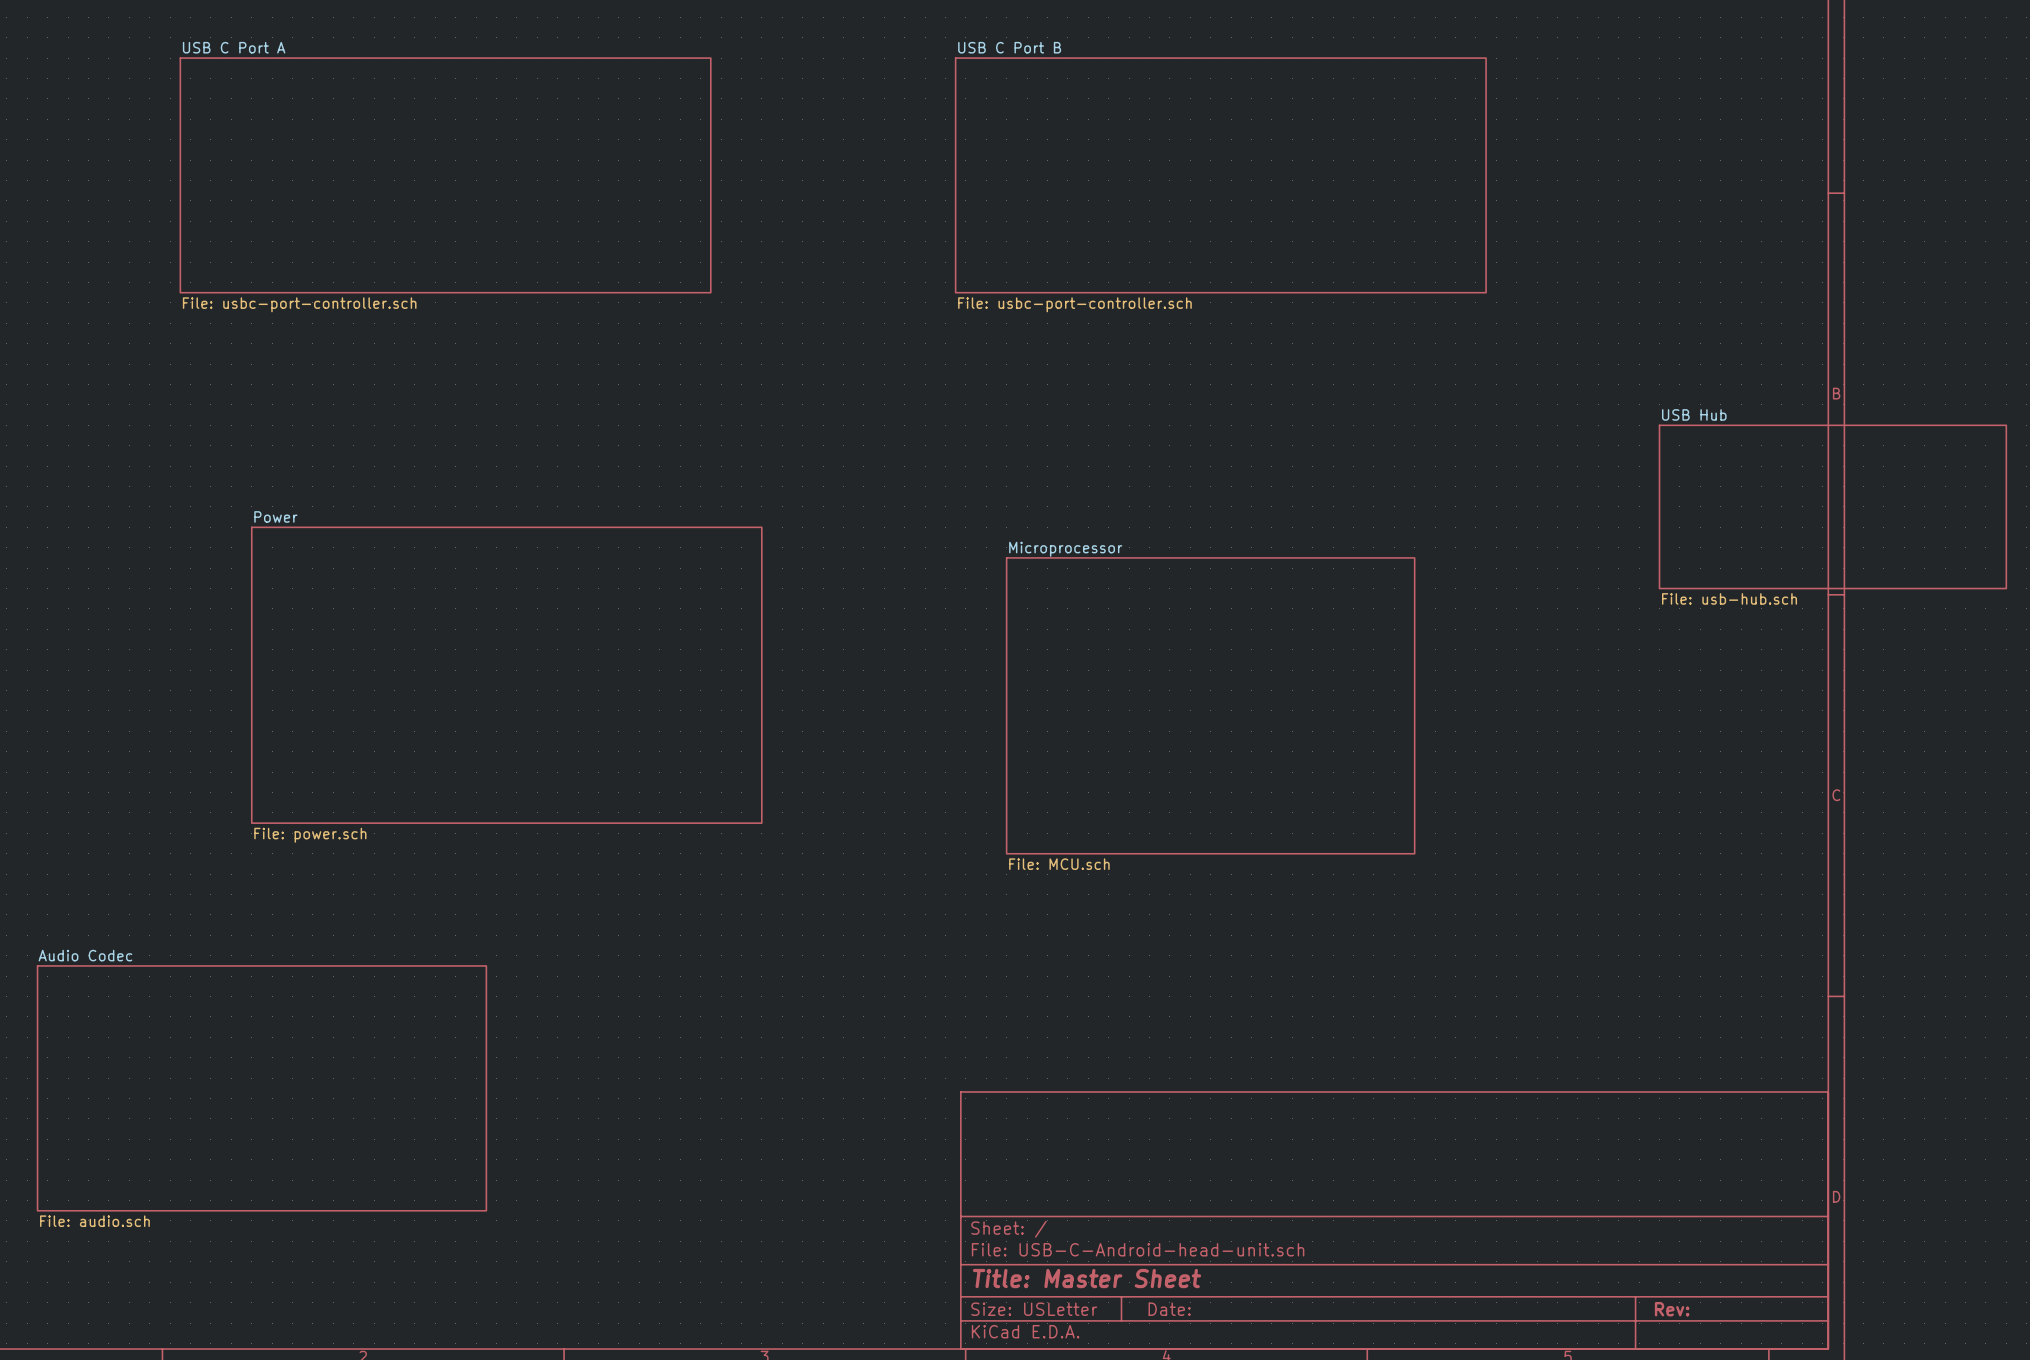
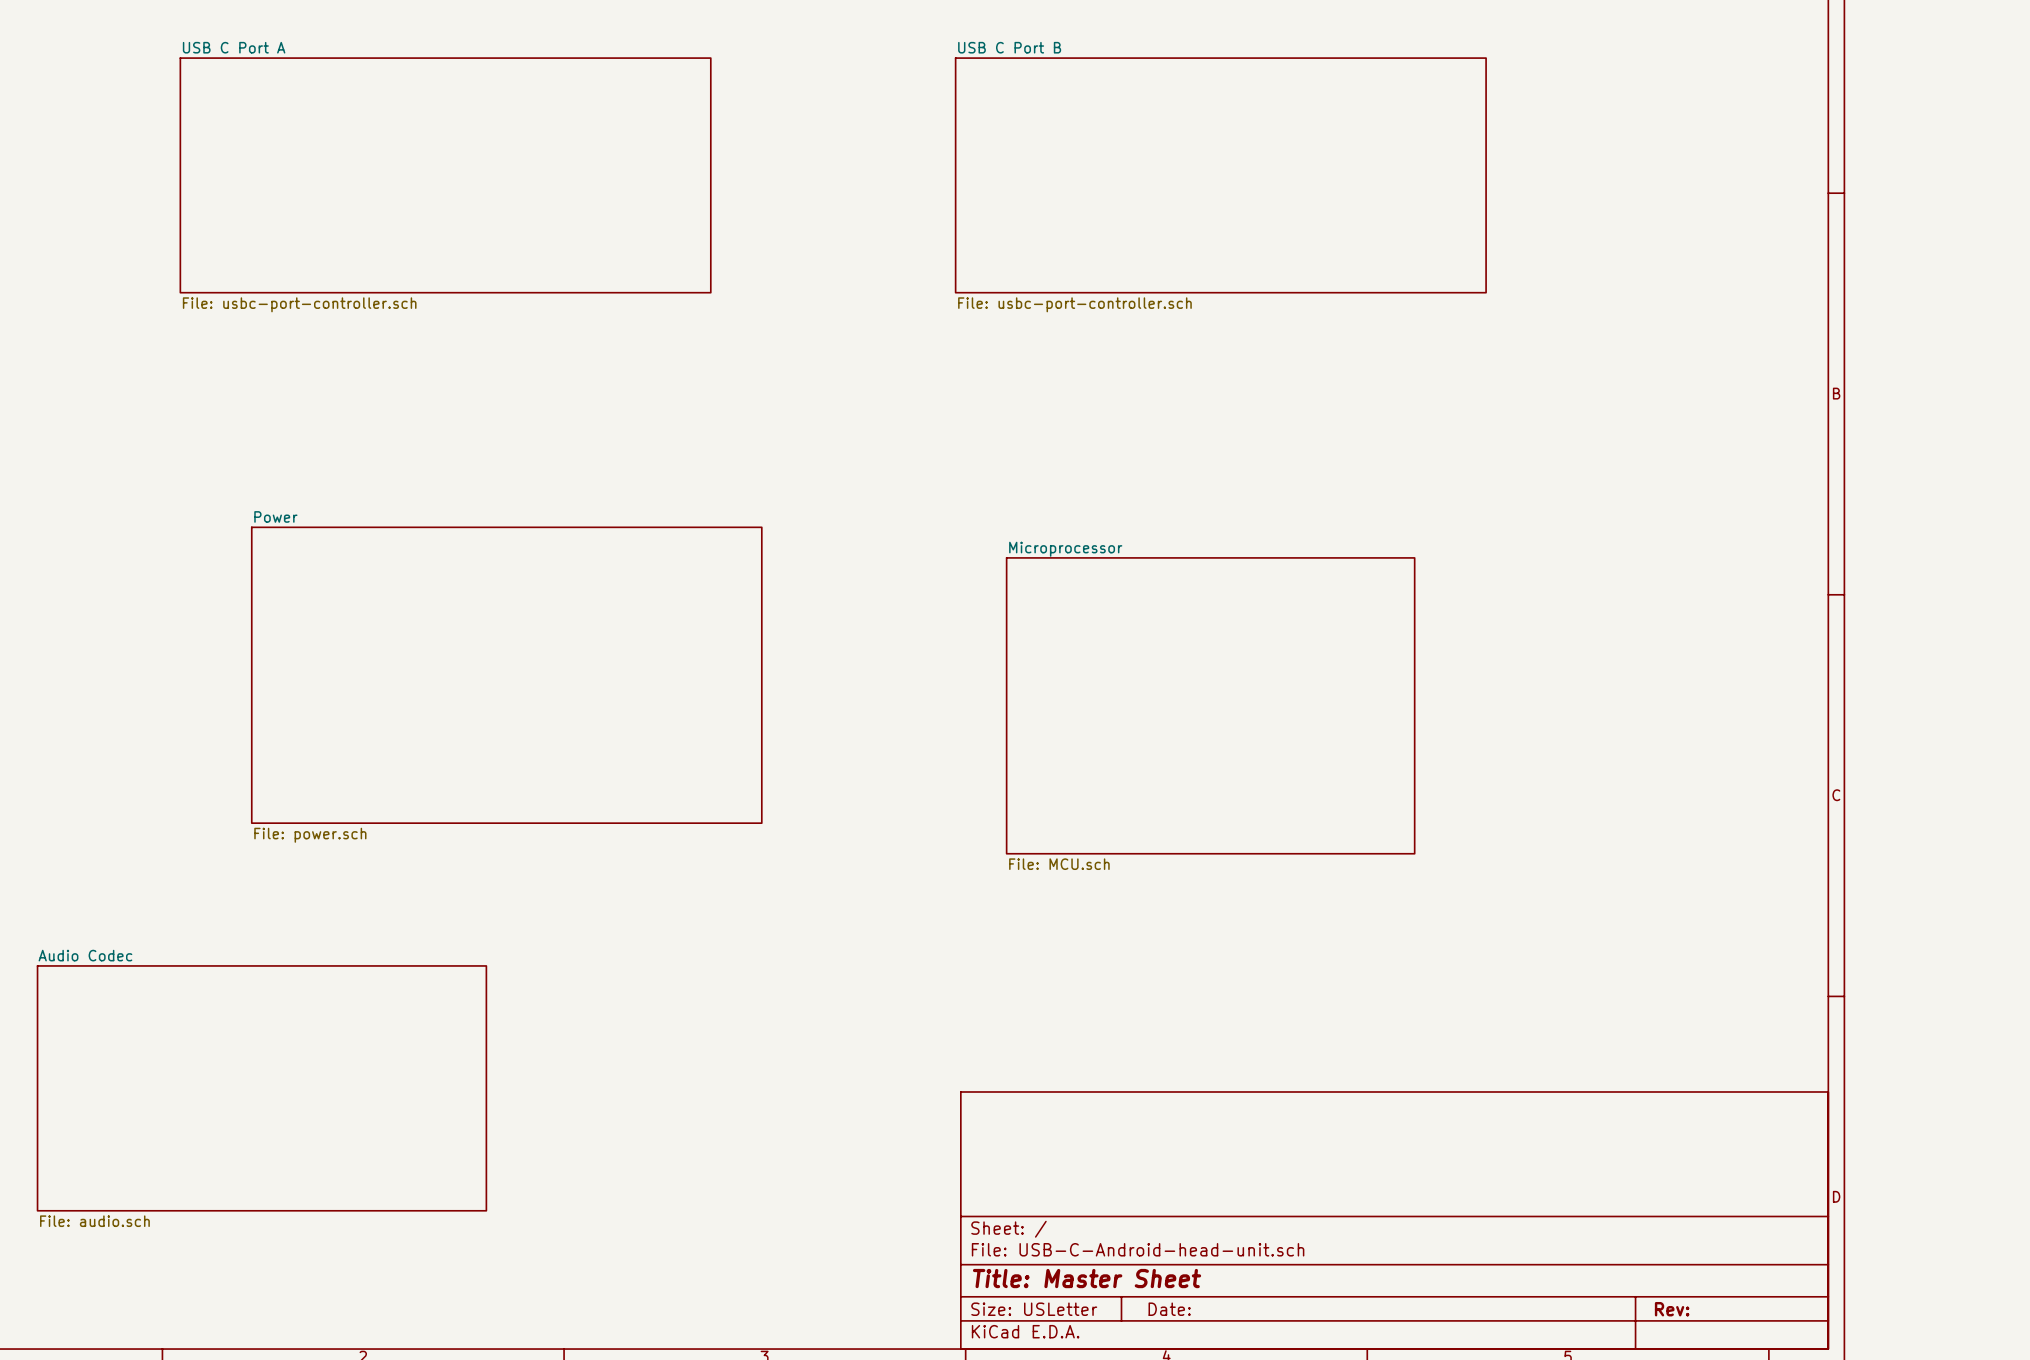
sheet USB Hub: File: usb-hub.sch (1832, 506) -> none

